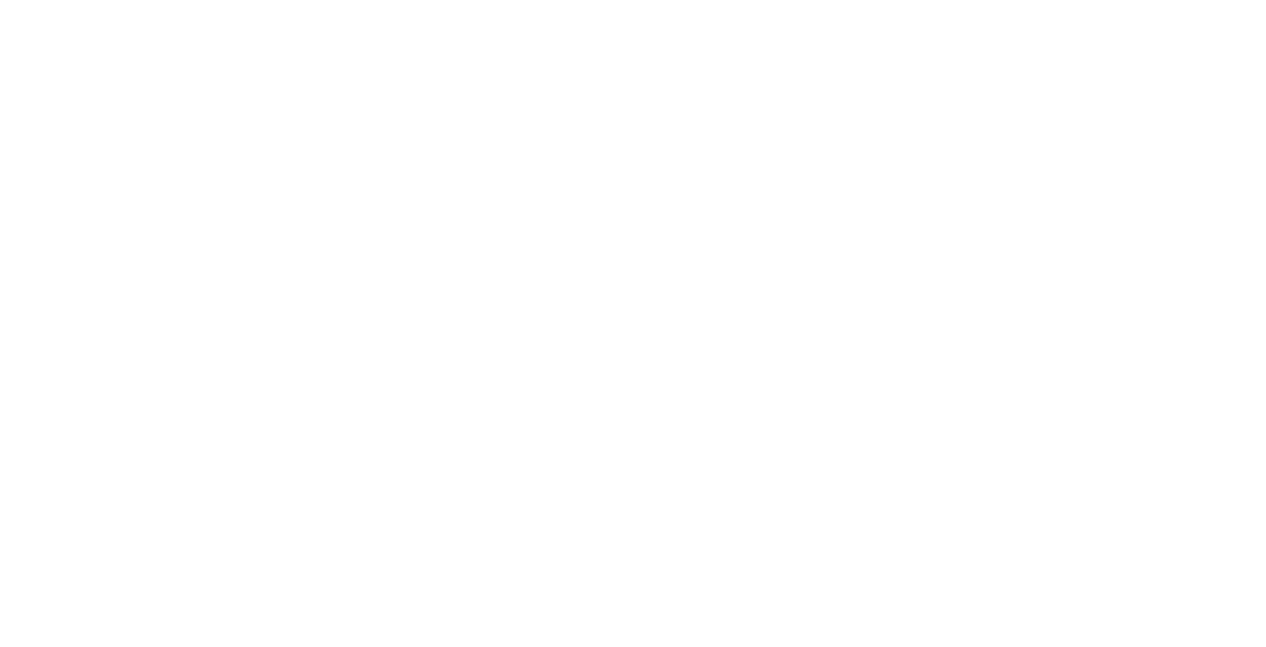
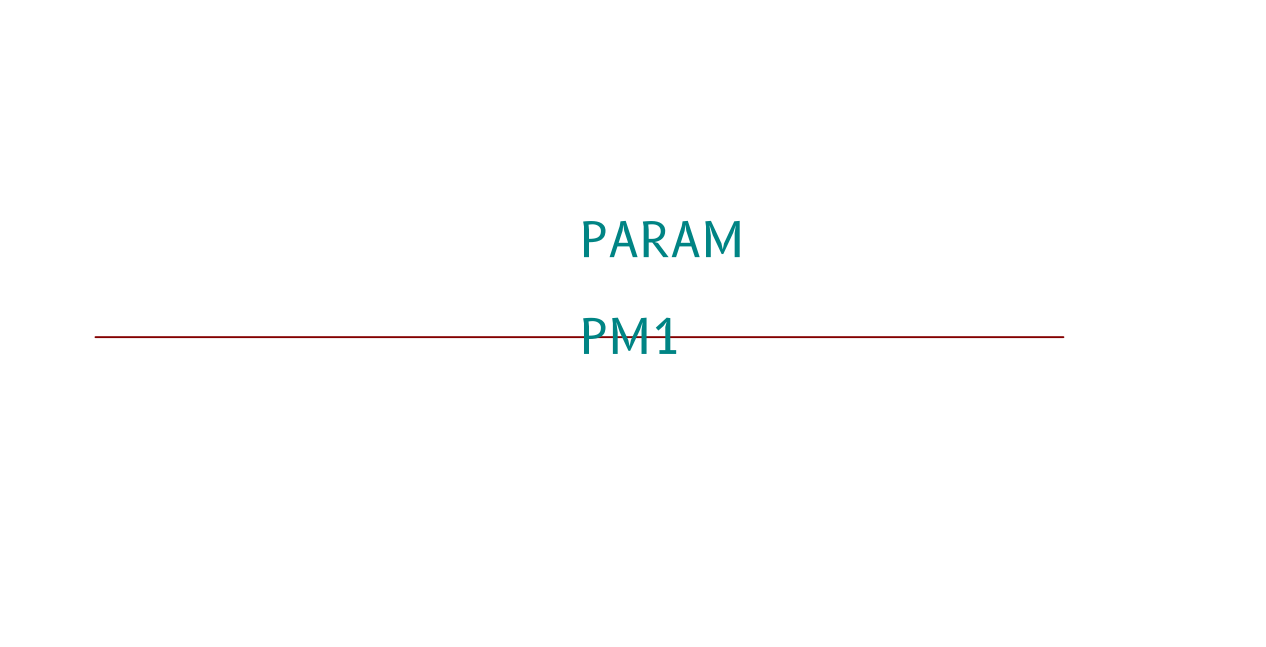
PM1: none -> PARAM (579, 337)

